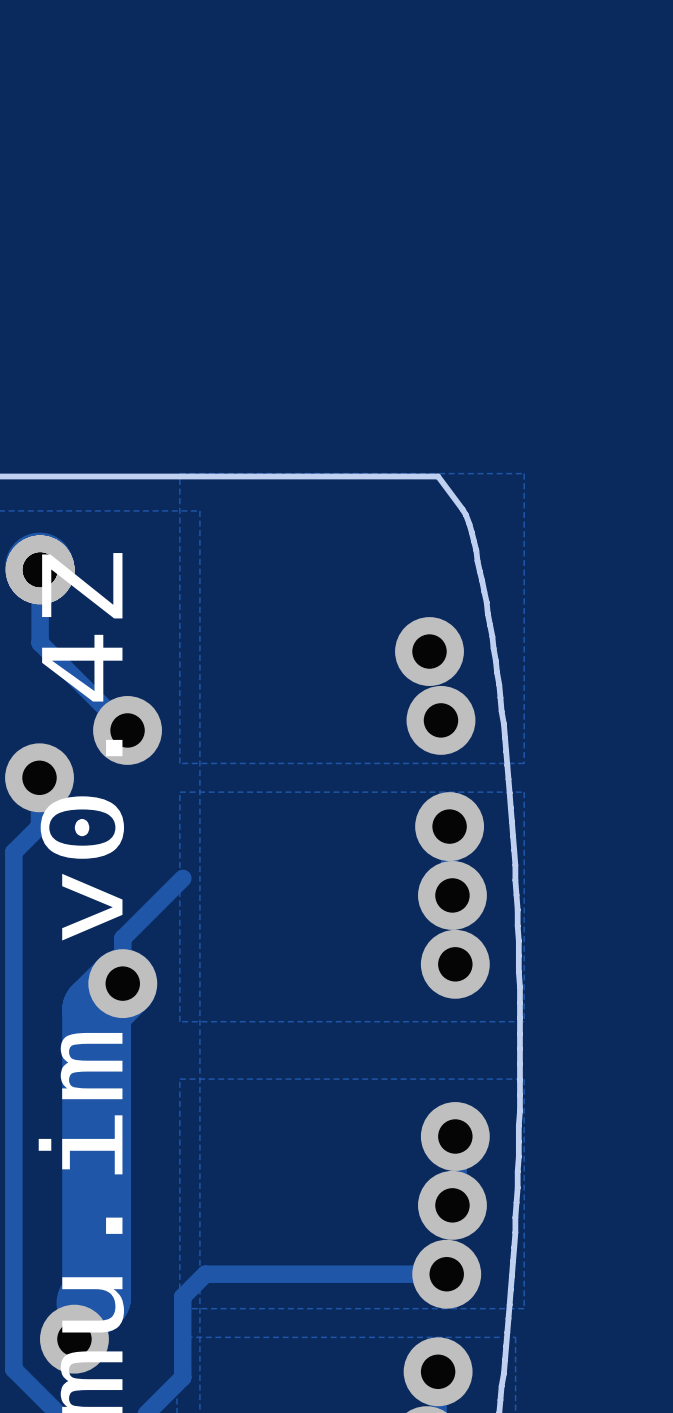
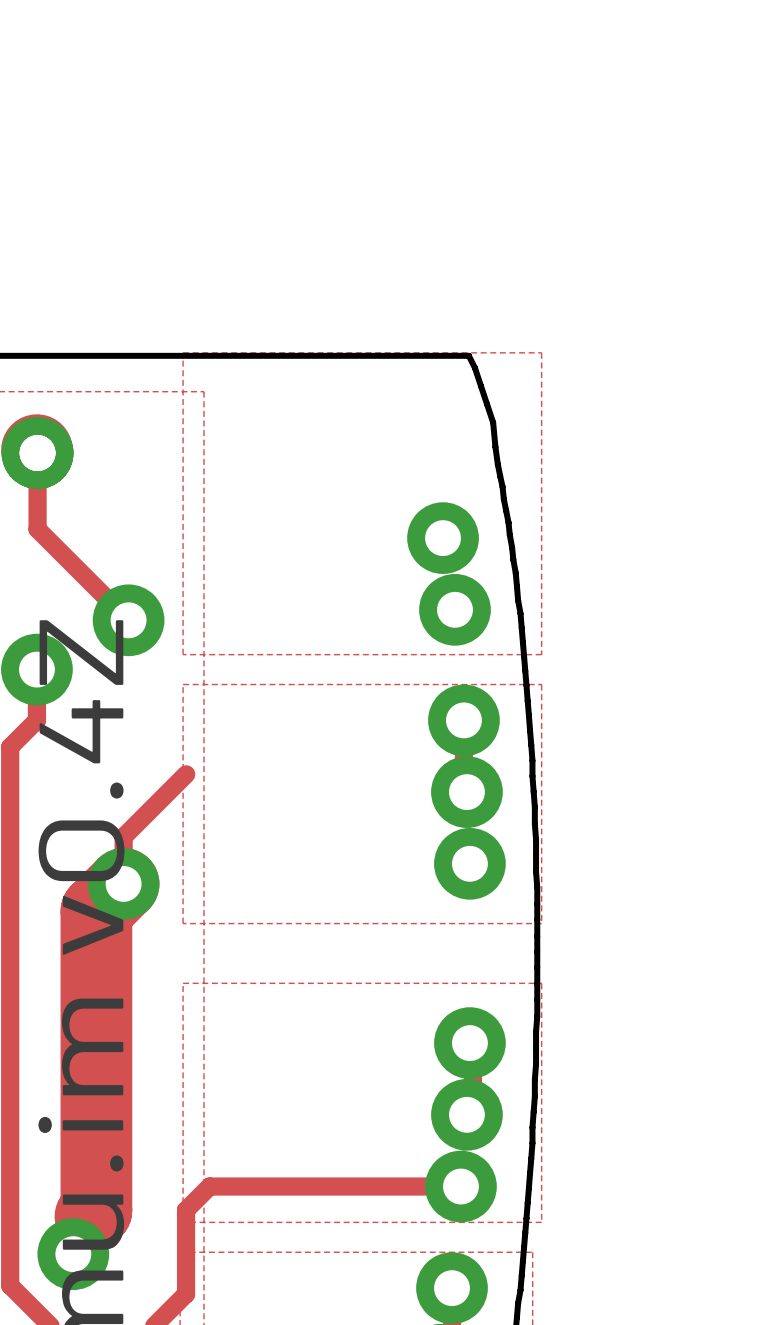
board edge: (438, 476) (466, 515) (476, 550) (482, 580) -> (452, 355) (468, 355) (474, 367) (493, 422) (497, 464)

